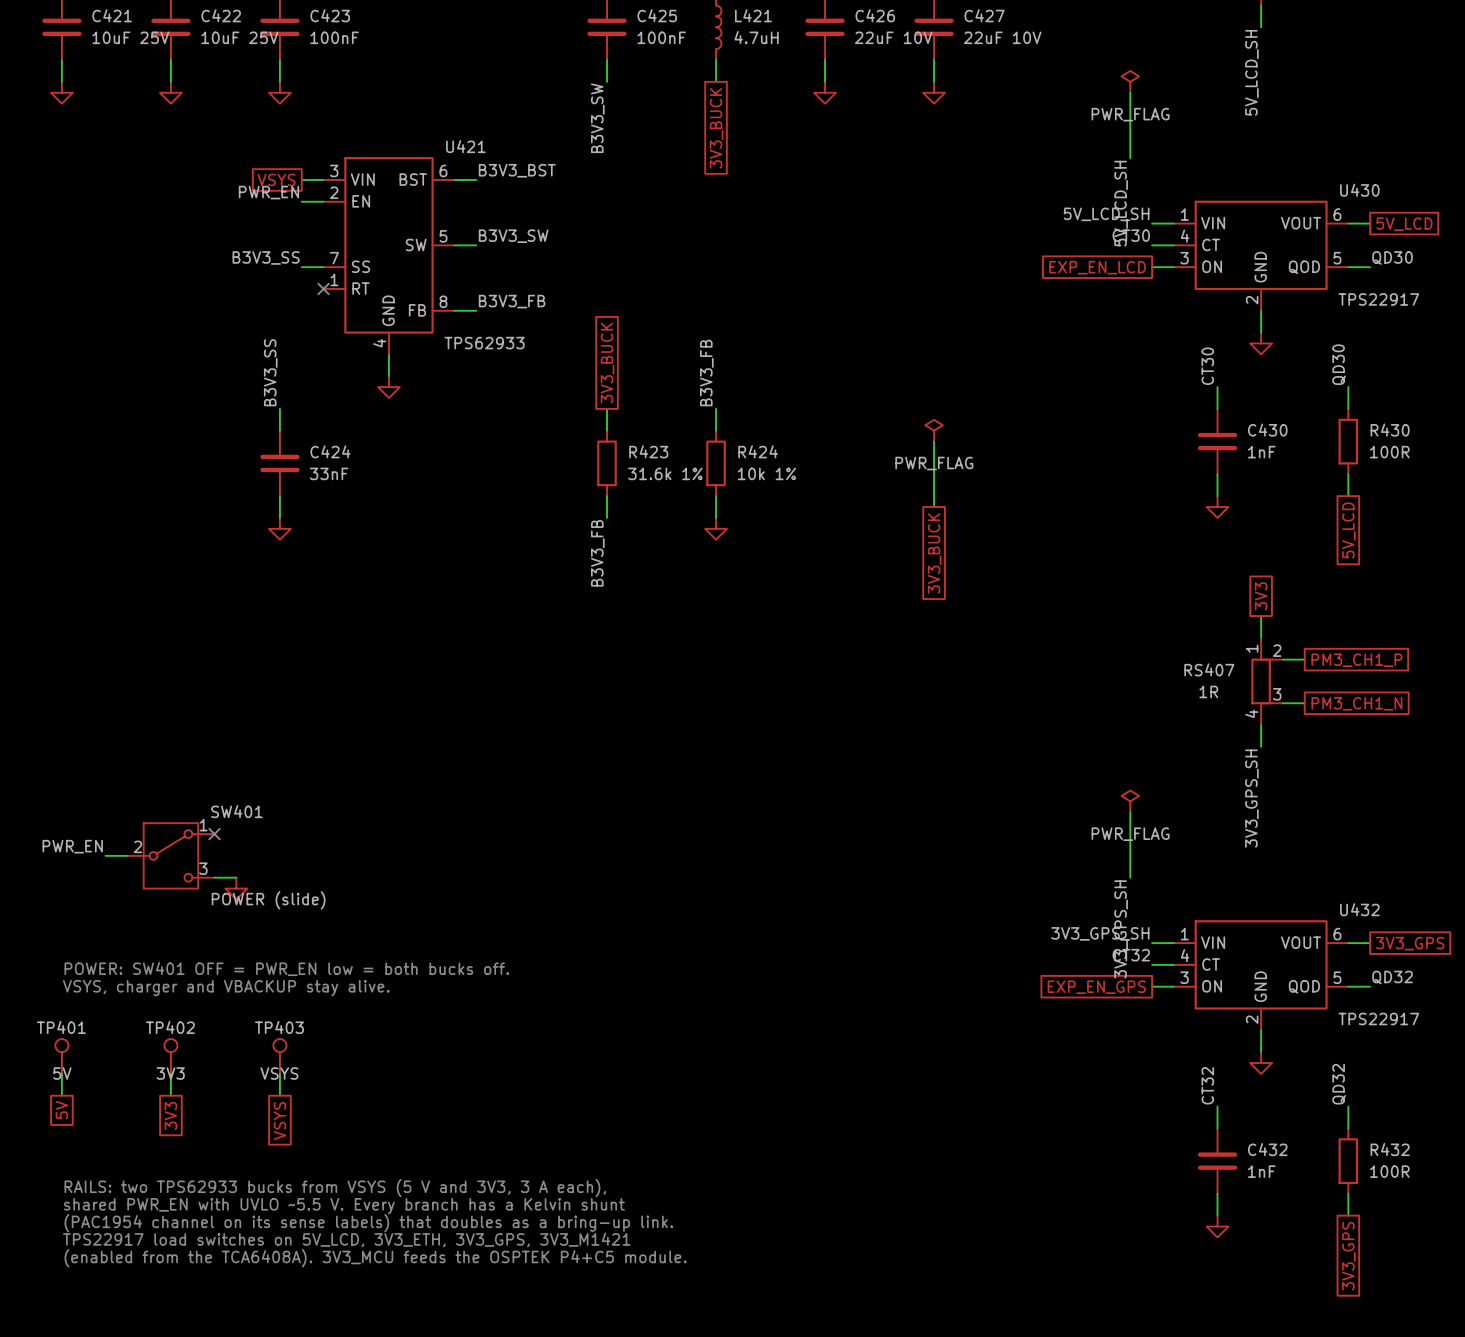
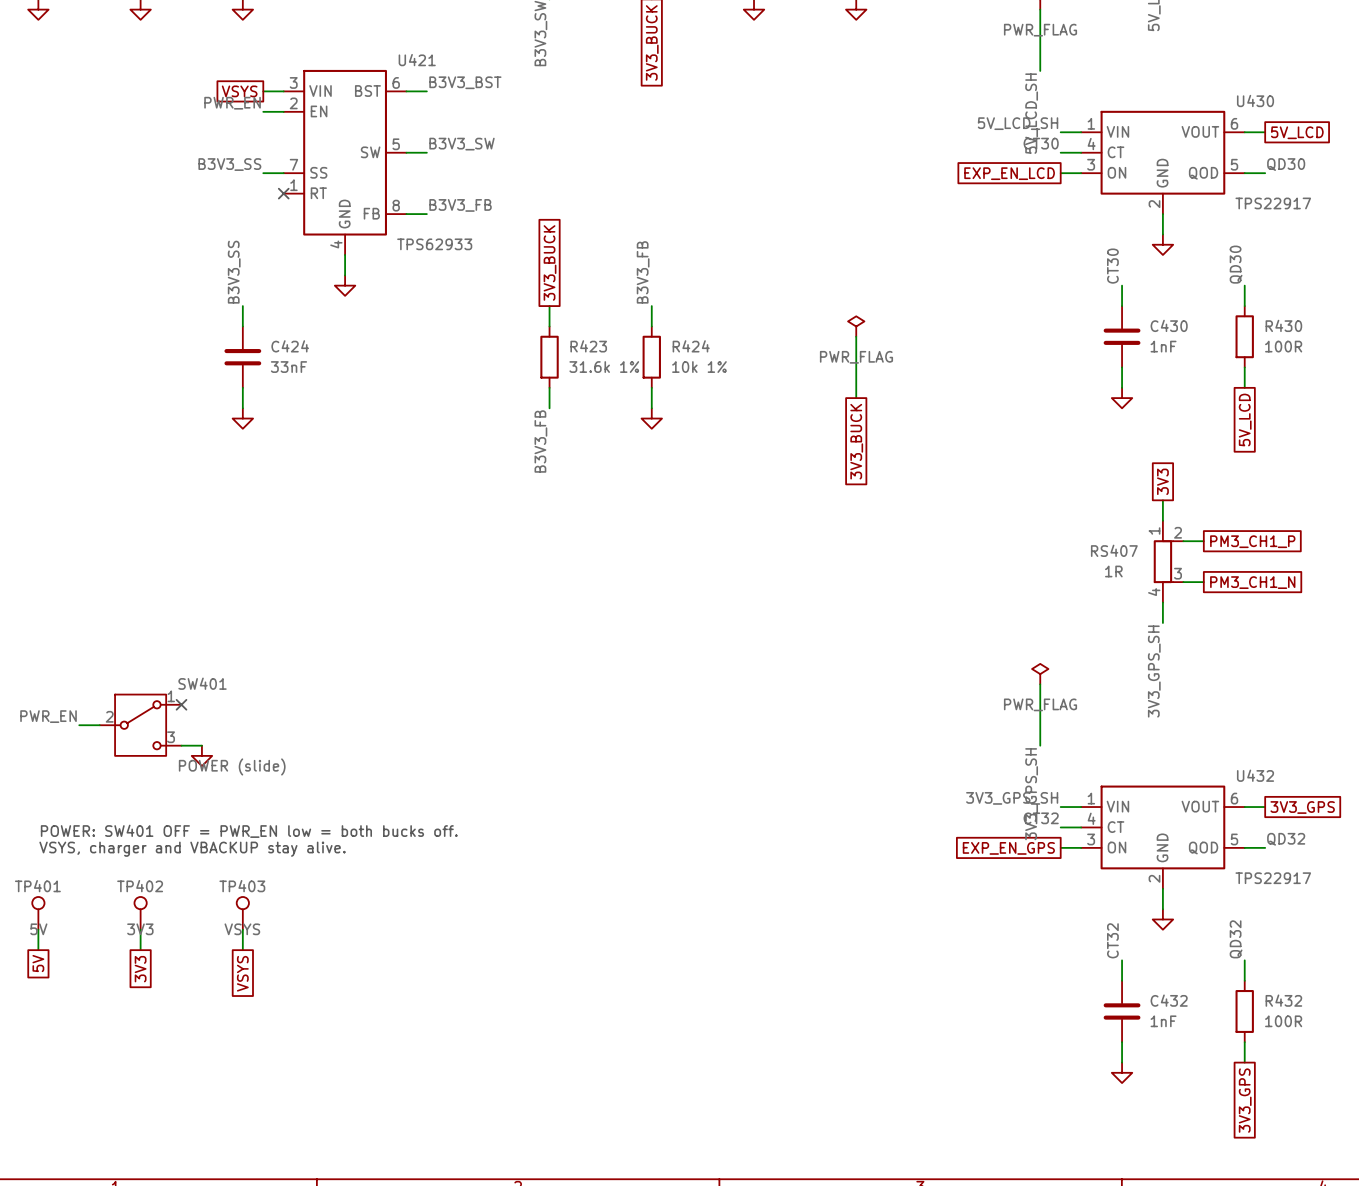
text: RAILS: two TPS62933 bucks from VSYS (5 V and 3V3, 3 A each), (335, 1188) -> none
text: shared PWR_EN with UVLO ~5.5 V. Every branch has a Kelvin shunt (344, 1206) -> none
text: (PAC1954 channel on its sense labels) that doubles as a bring-up link. (368, 1223) -> none
text: TPS22917 load switches on 5V_LCD, 3V3_ETH, 3V3_GPS, 3V3_M1421 (346, 1239) -> none
text: (enabled from the TCA6408A). 3V3_MCU feeds the OSPTEK P4+C5 module. (375, 1258) -> none

